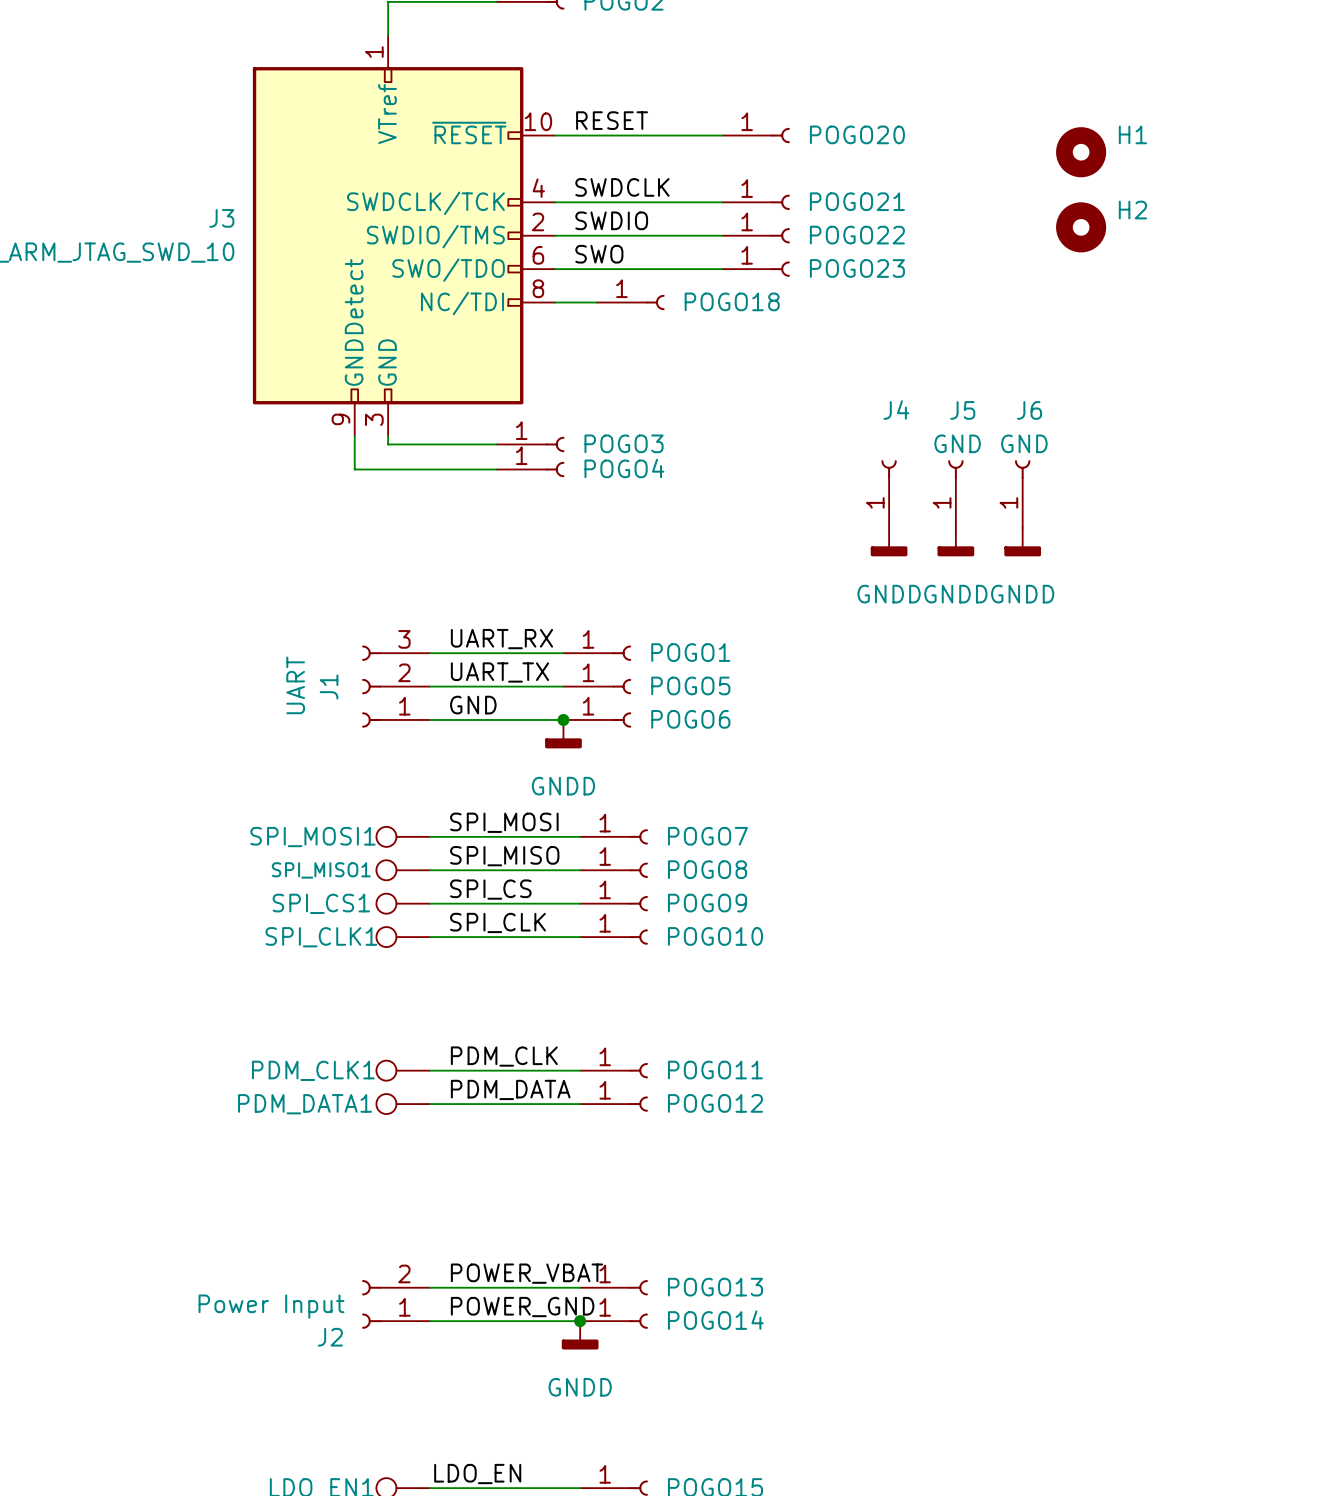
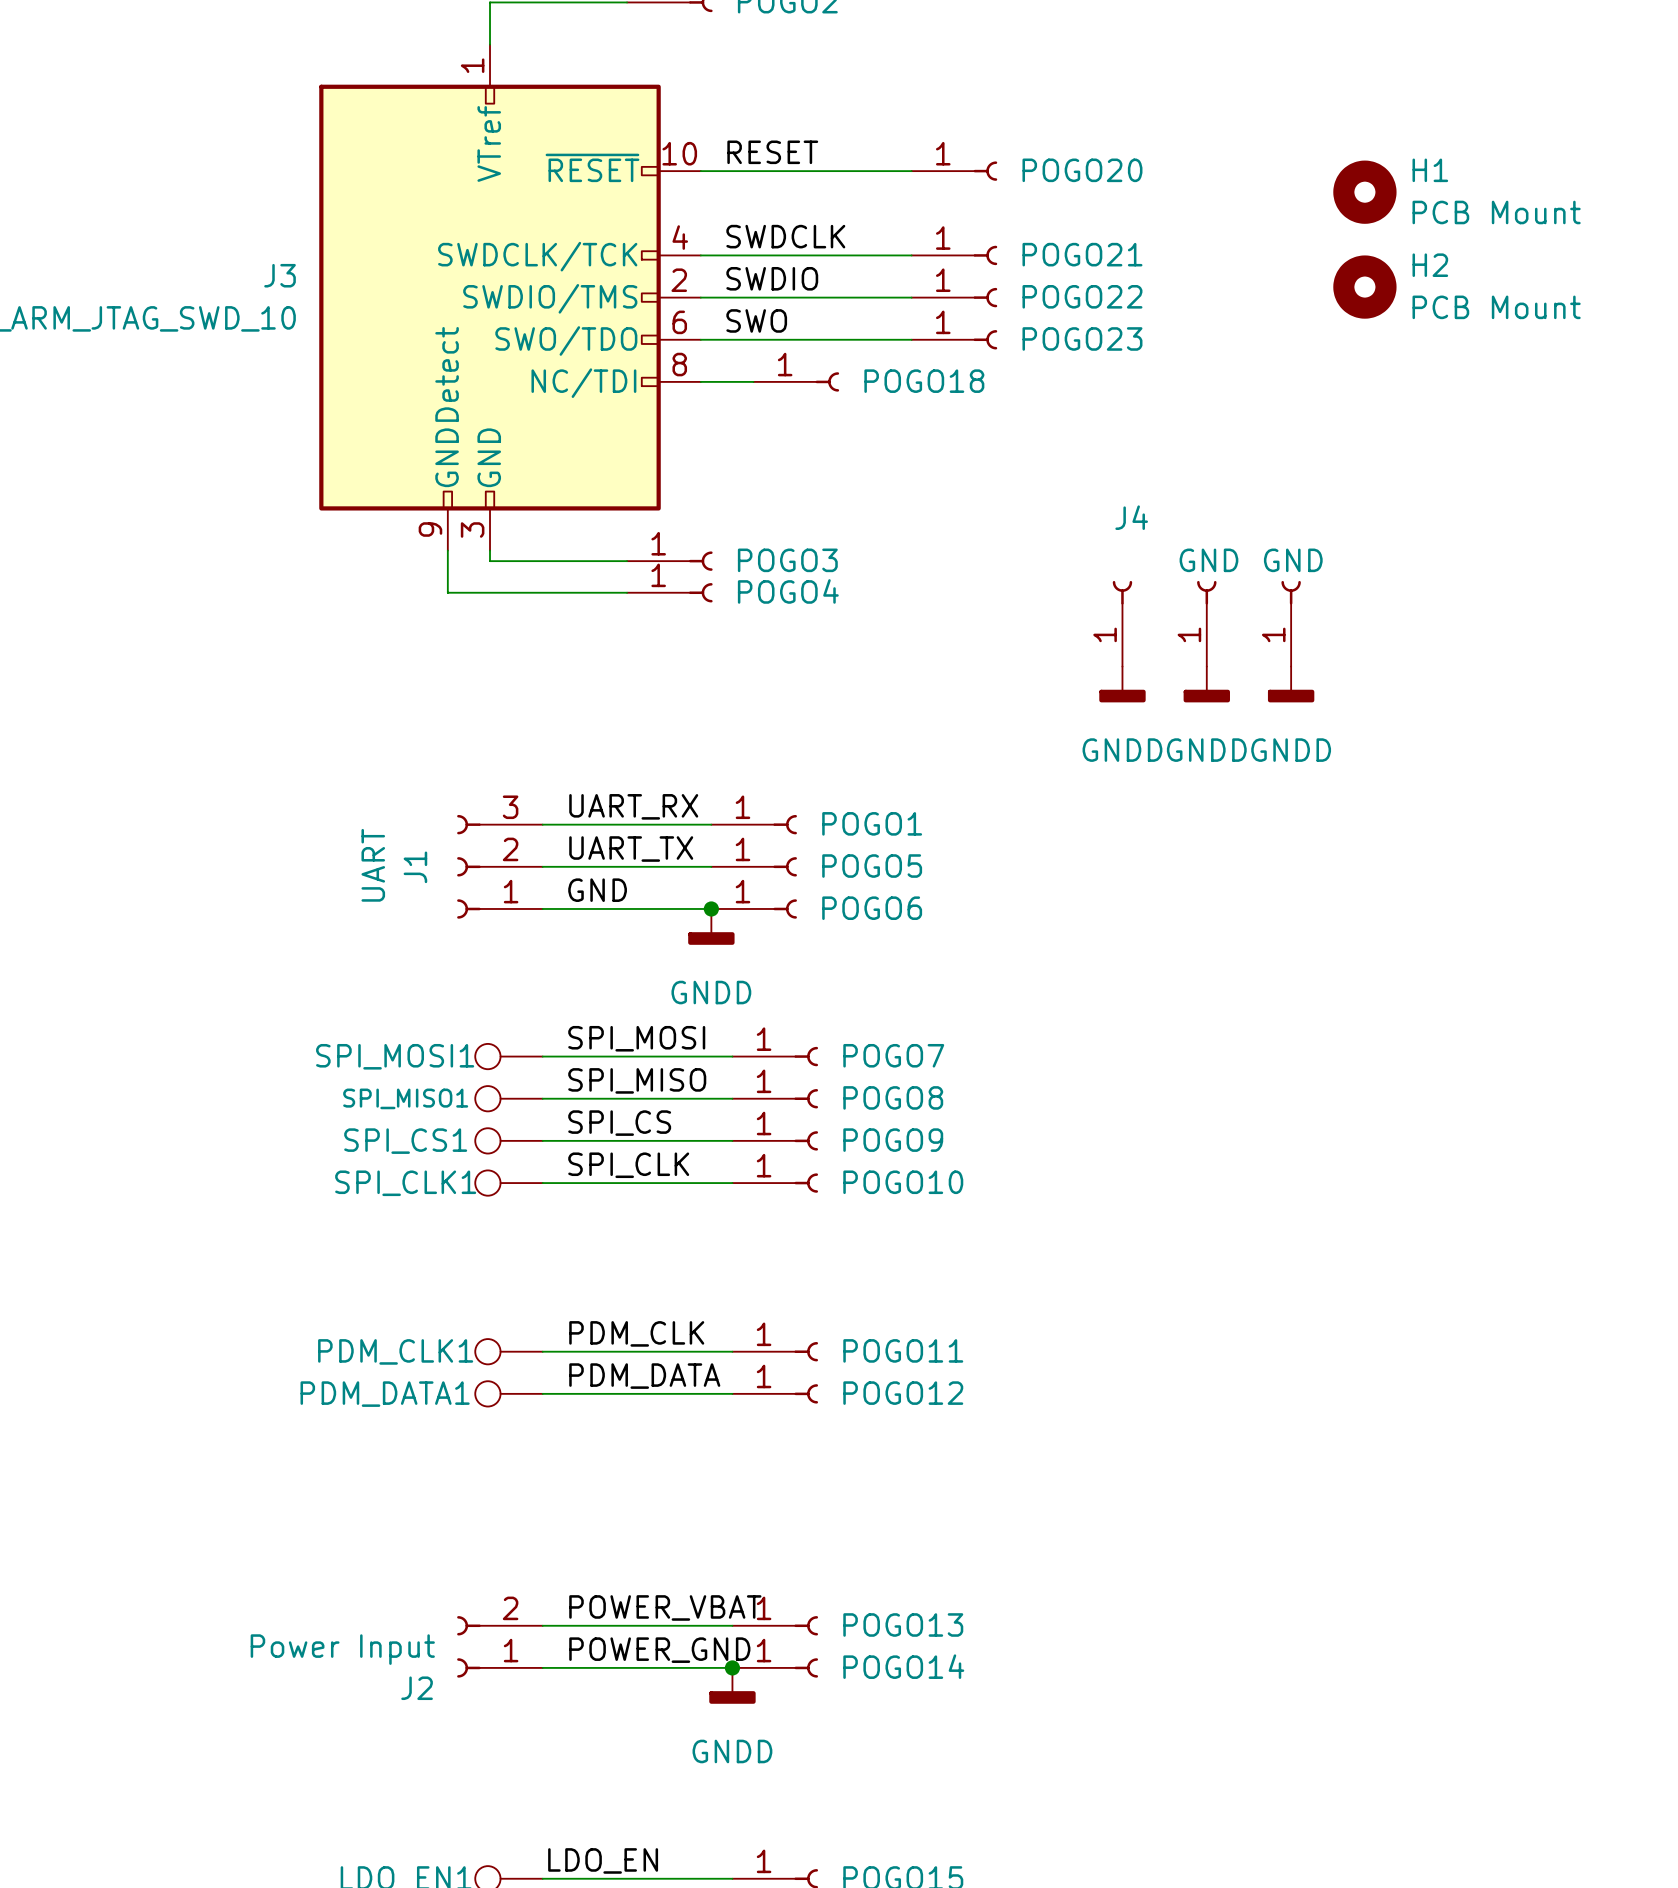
H1 value: none -> PCB Mount (1496, 212)
H2 value: none -> PCB Mount (1496, 307)
J5 name: J5 (962, 410) -> none
J6 name: J6 (1029, 410) -> none

